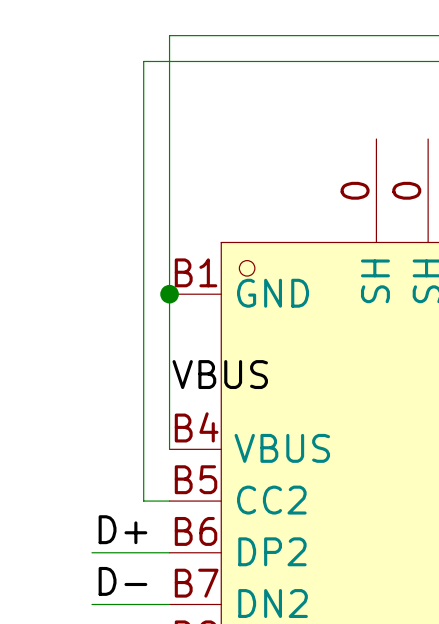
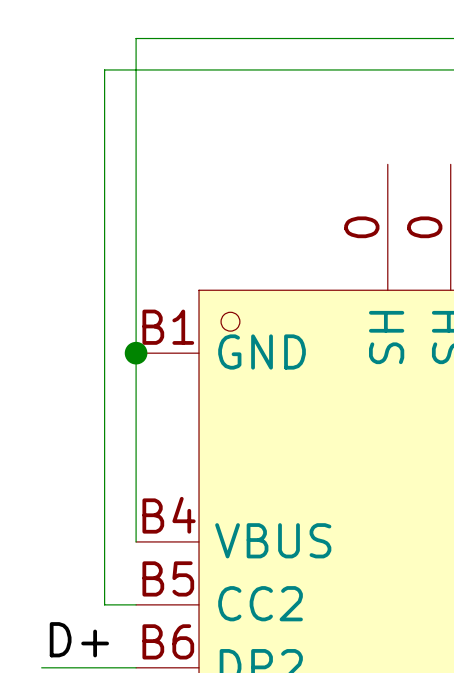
label: VBUS (220, 374) -> none

